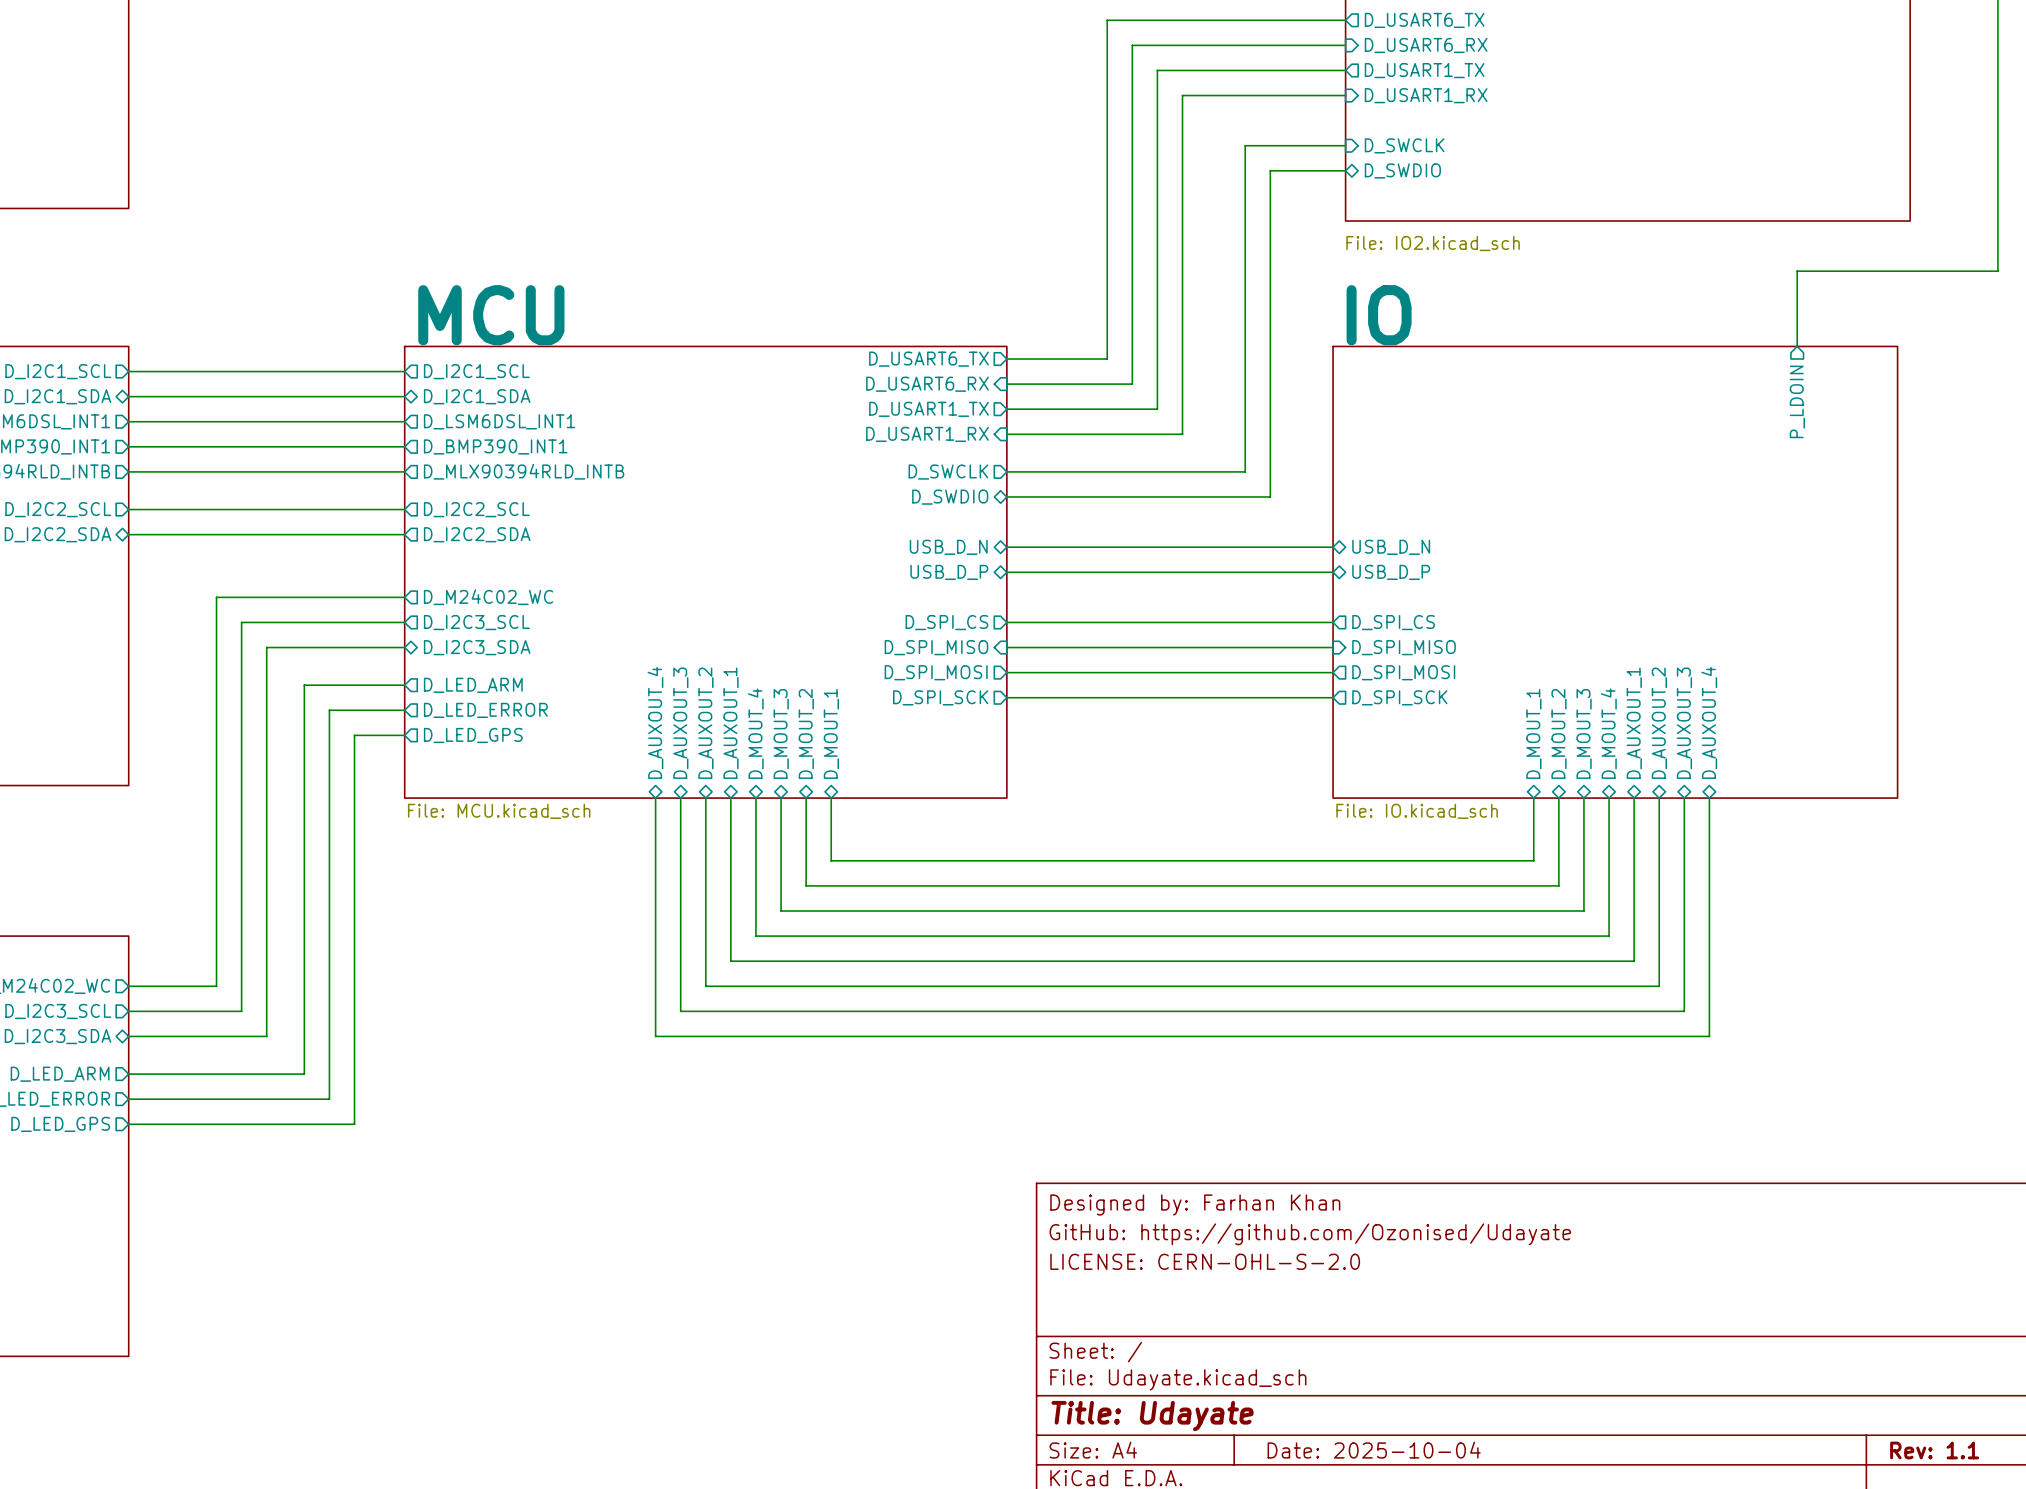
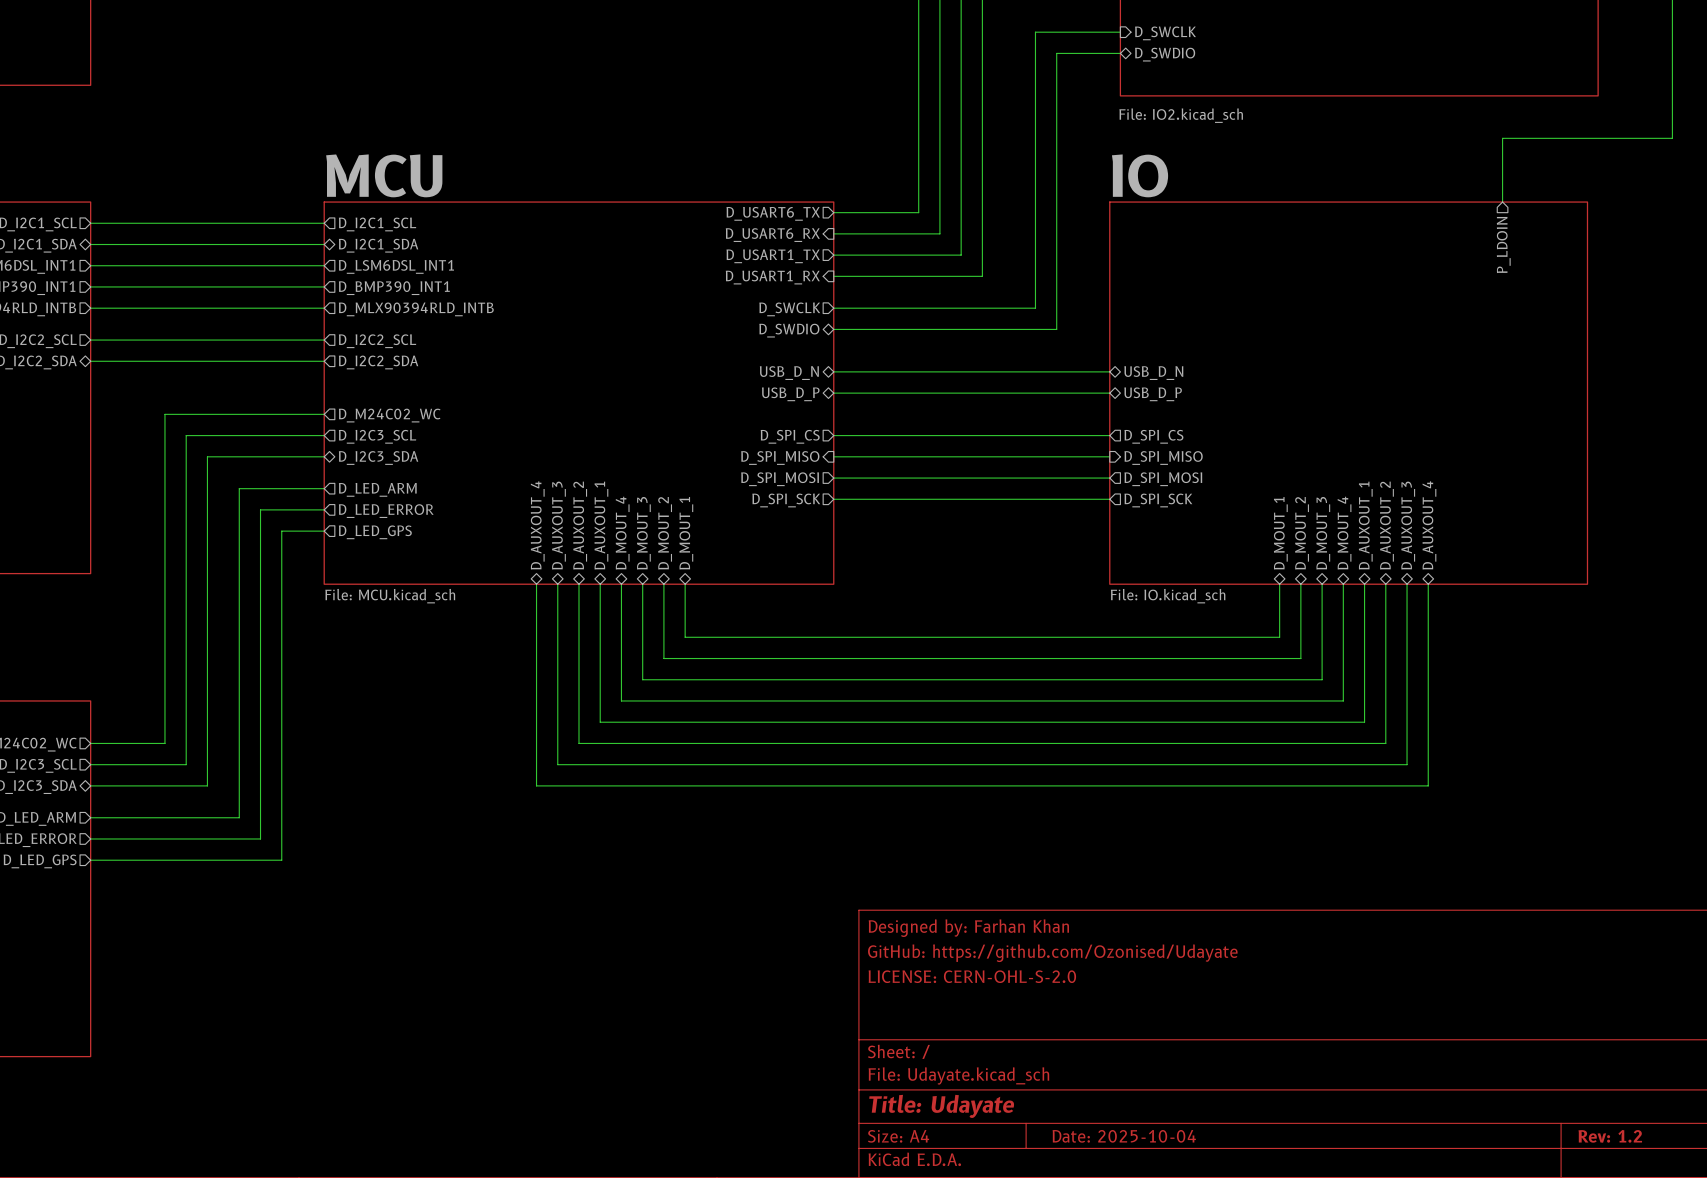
title block: Rev: 1.1 (1934, 1450) -> Rev: 1.2 (1610, 1136)

